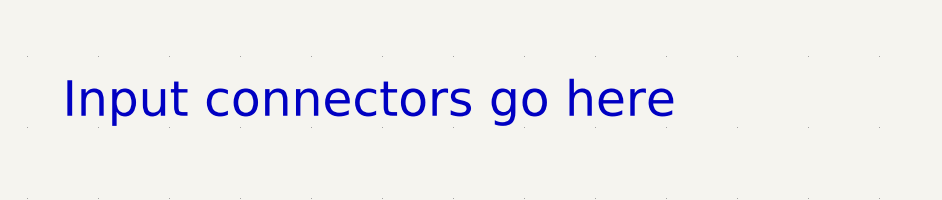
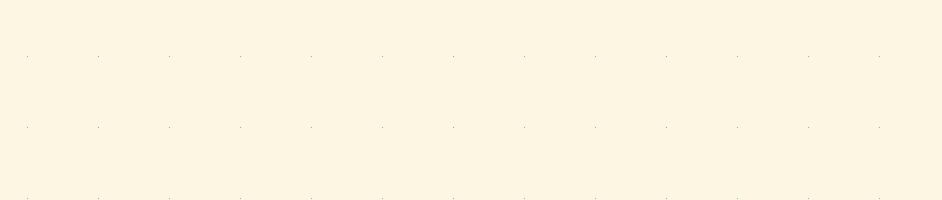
text: Input connectors go here (370, 102) -> none

